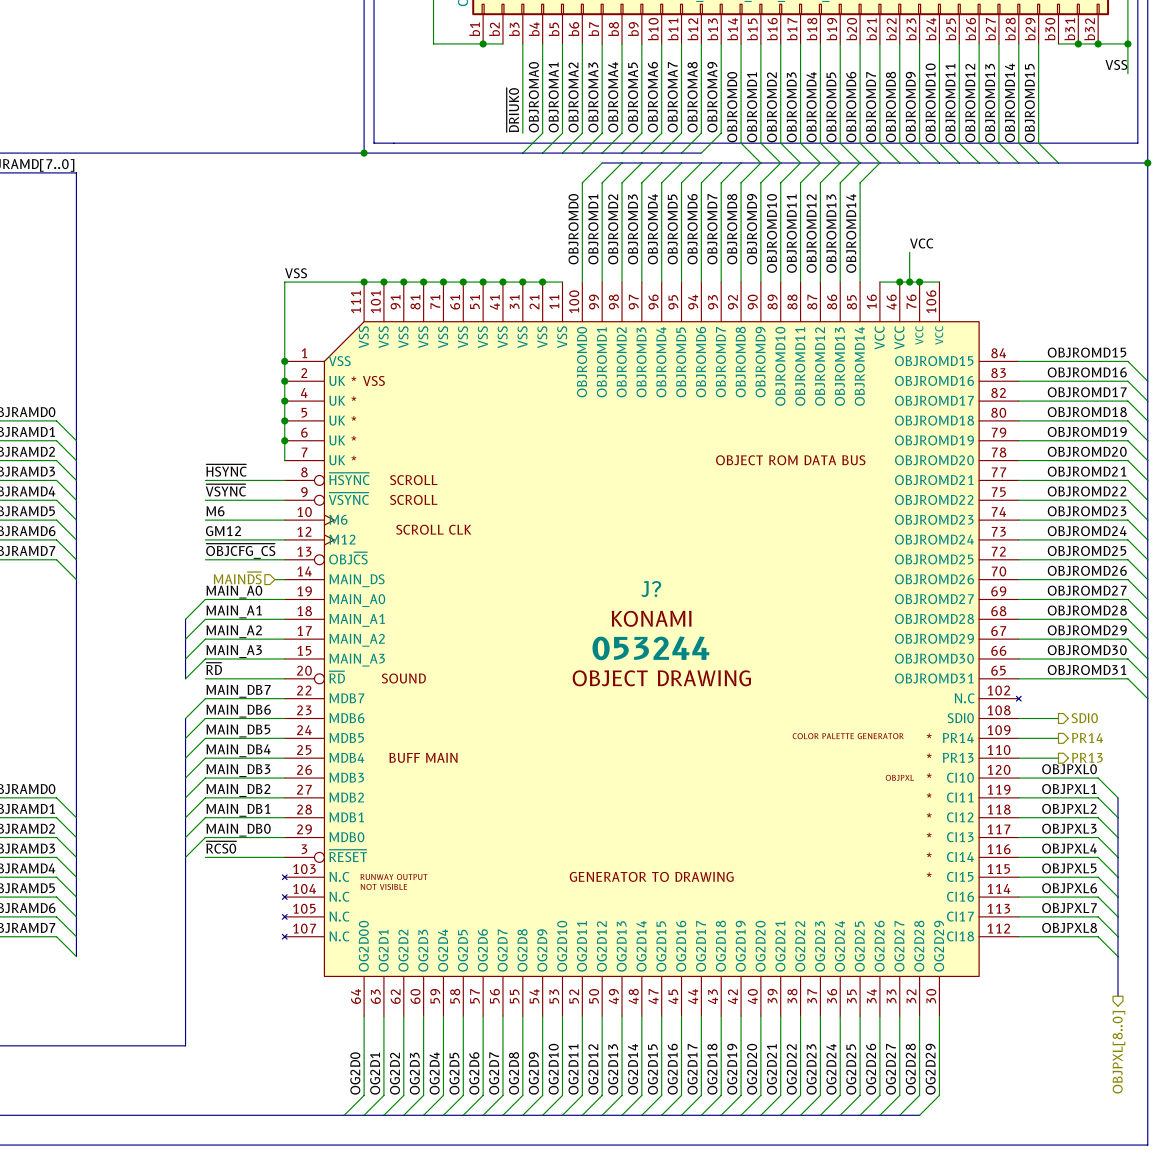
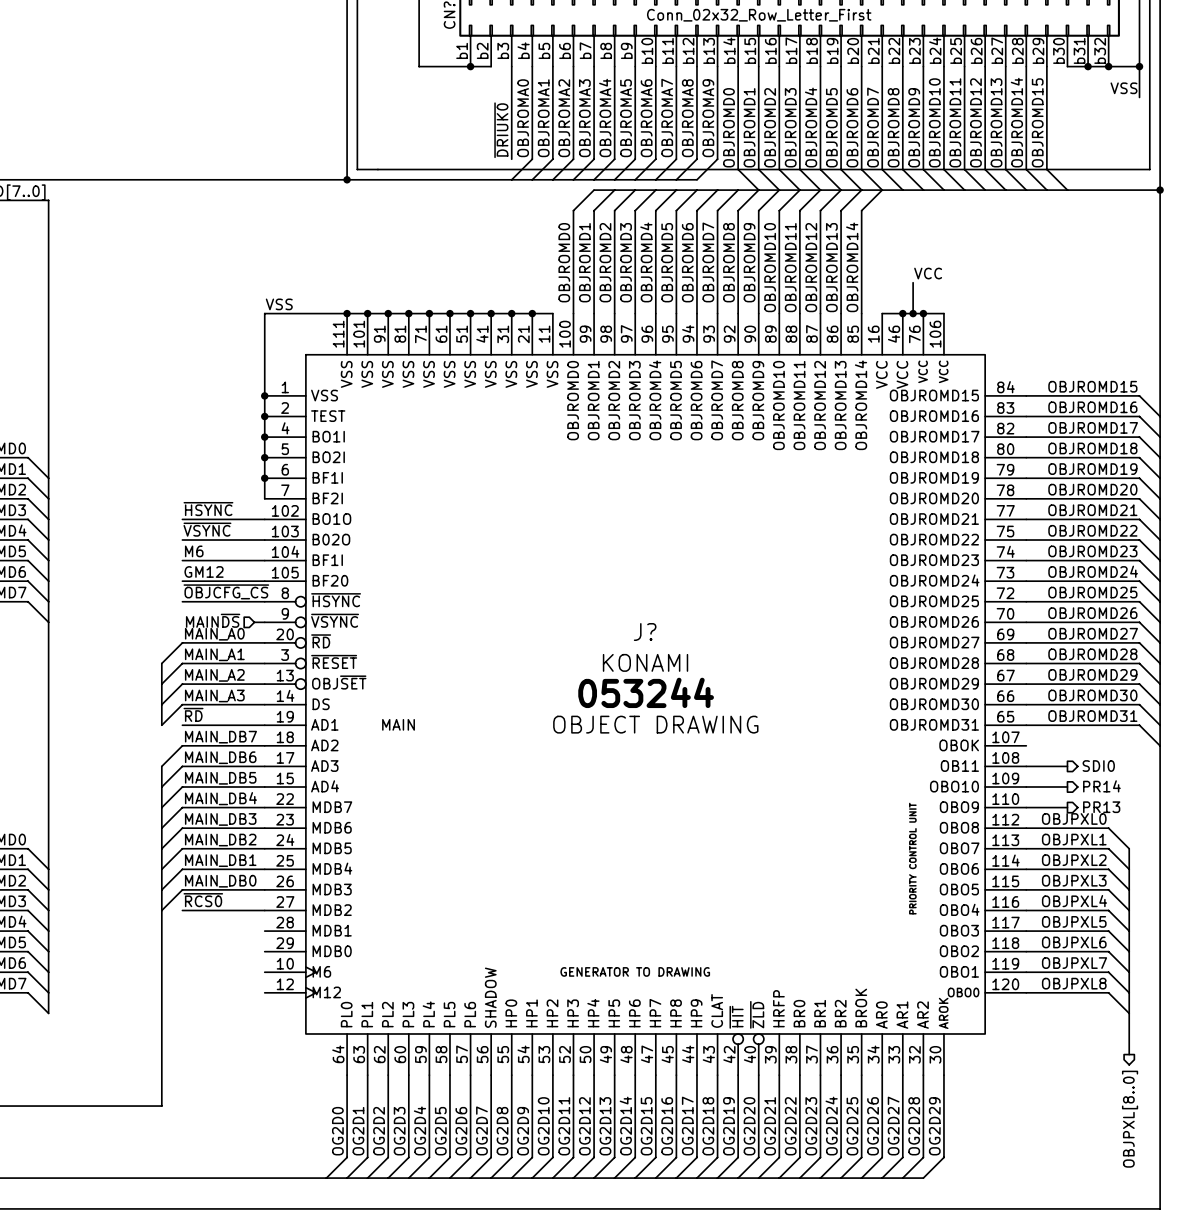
J? symbol: [282, 282, 1022, 1017] -> [264, 313, 1027, 1076]

